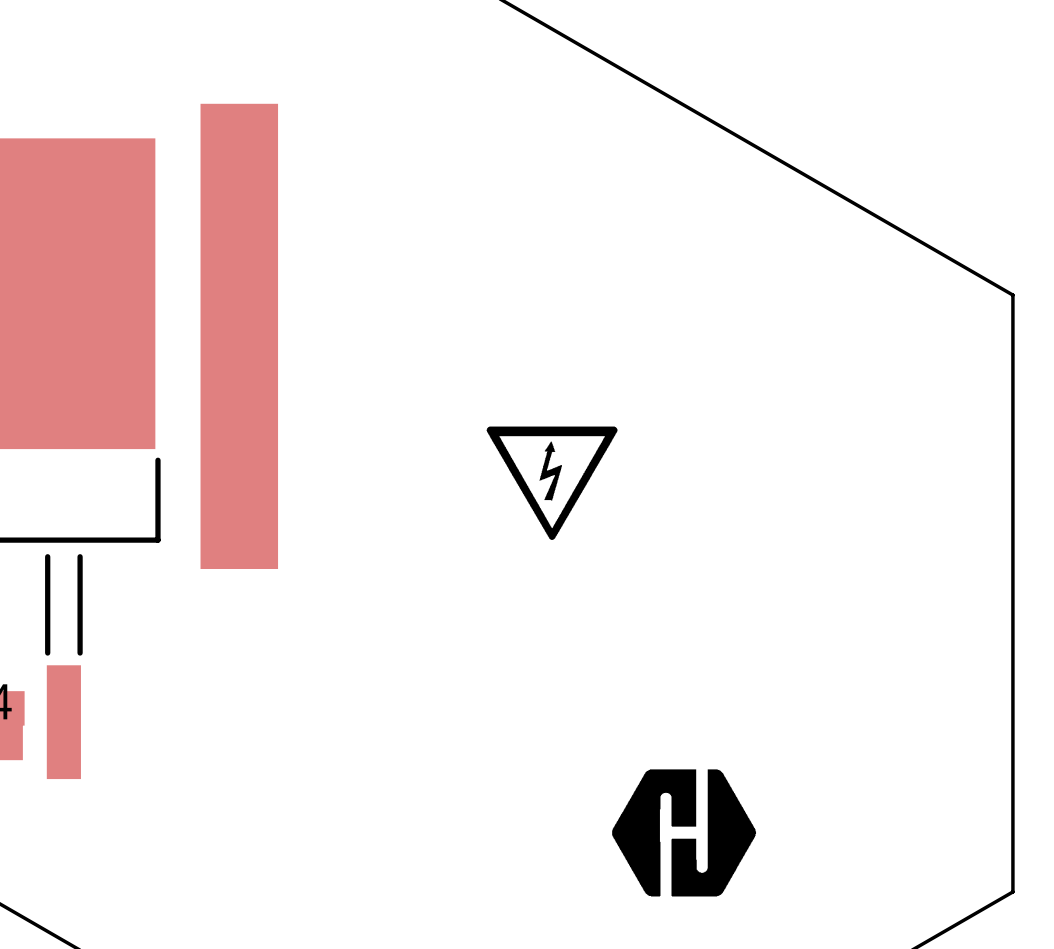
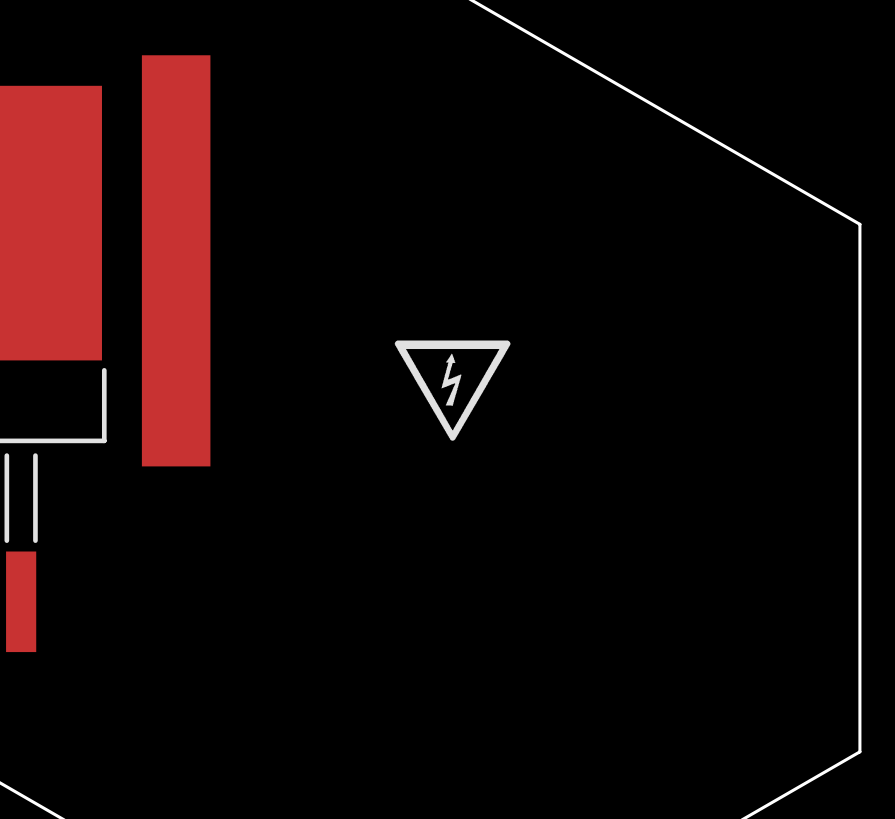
drawing: [612, 769, 757, 897] -> none

